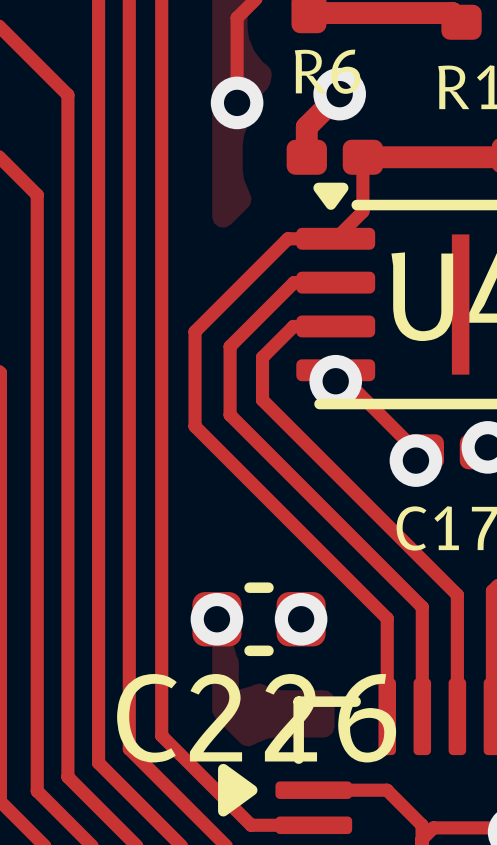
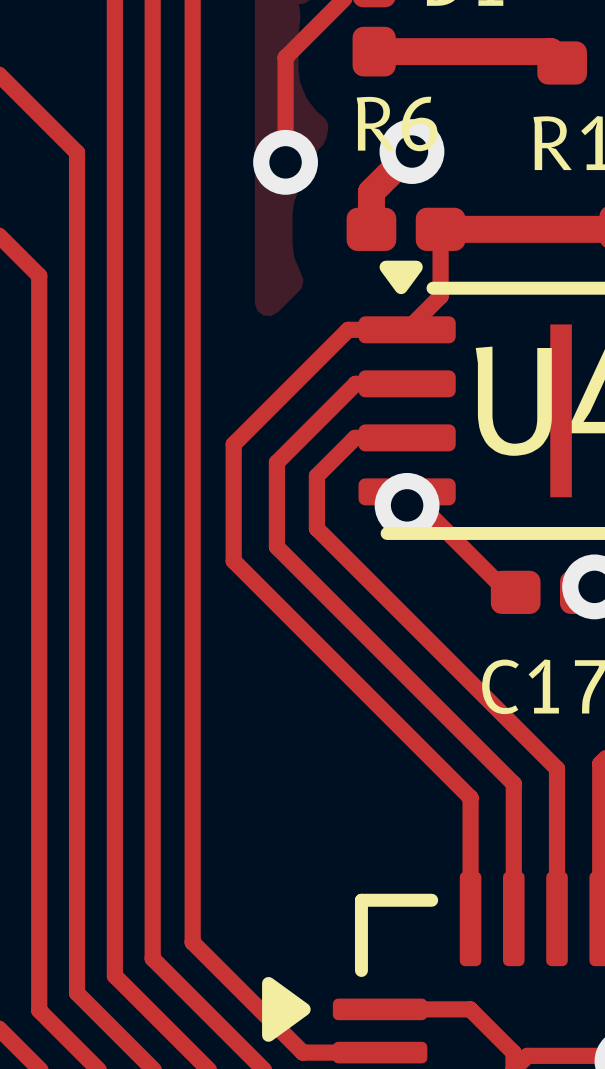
via: (415, 460) -> none
via: (216, 619) -> none
C226: (259, 619) -> none
via: (301, 619) -> none

